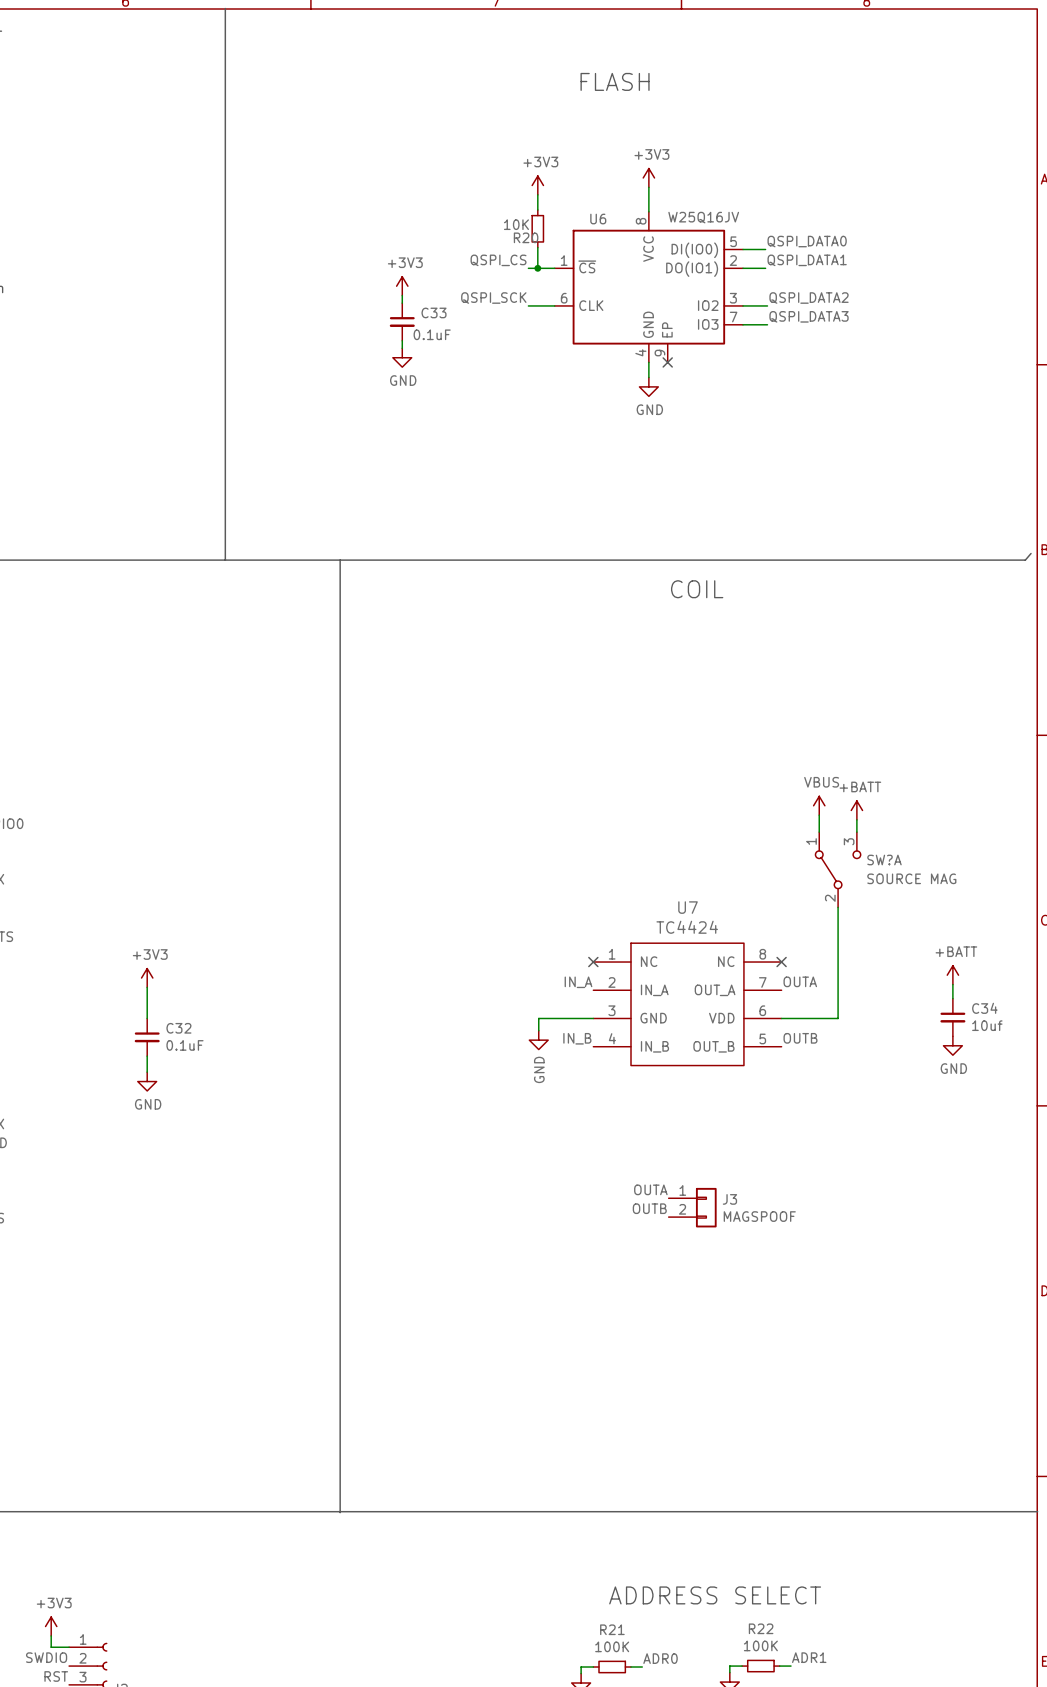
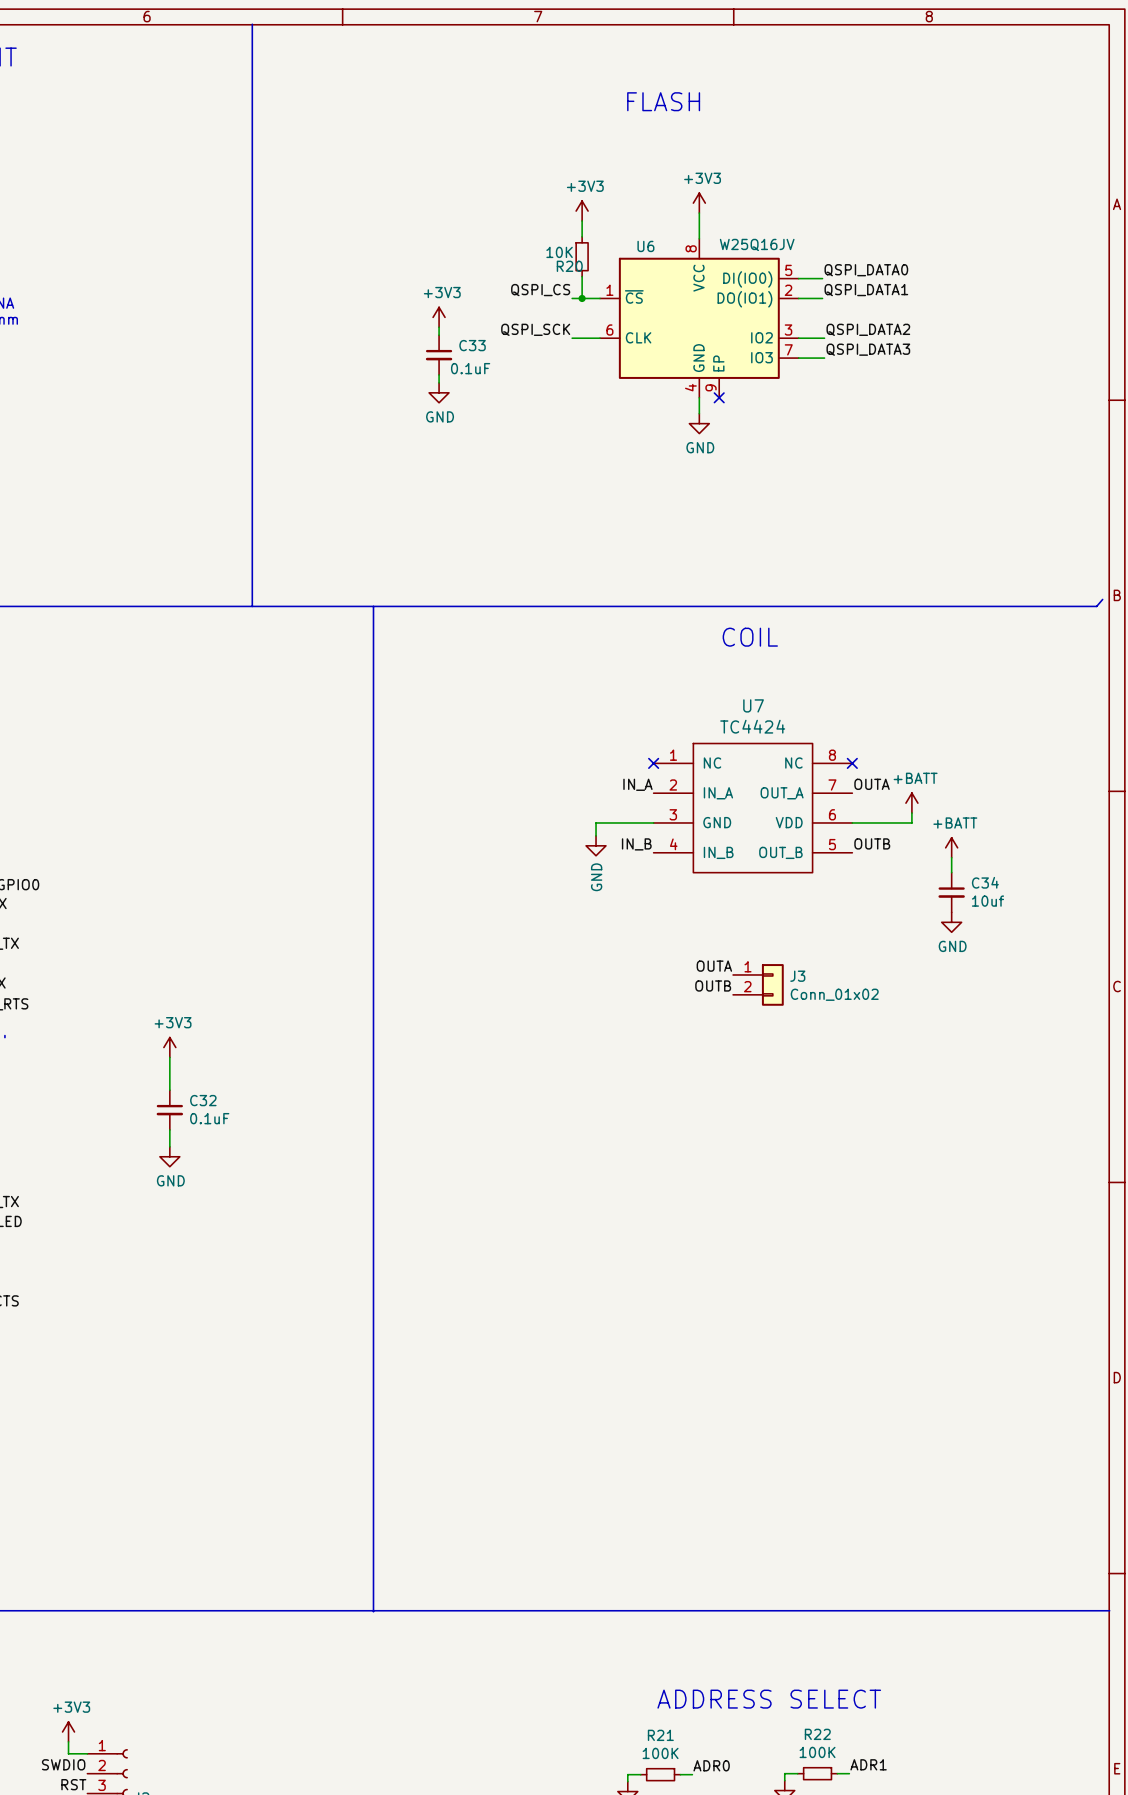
no-connect mark: none -> (653, 763)
no-connect mark: none -> (852, 763)
label: none -> OUTA (872, 784)
label: none -> IN_A (637, 784)
power symbol: none -> +BATT (911, 803)
wire: none -> (911, 813) (911, 822) (852, 822)
wire: none -> (653, 822) (596, 822) (596, 835)
label: none -> IN_B (636, 844)
label: none -> OUTB (872, 843)
power symbol: none -> GND (596, 845)
power symbol: none -> +BATT (951, 847)
wire: none -> (951, 857) (951, 872)
power symbol: VBUS (819, 805) -> none
power symbol: +BATT (856, 810) -> none
wire: (819, 815) (819, 832) -> none
wire: (856, 819) (856, 832) -> none
power symbol: none -> GND (951, 922)
SW?A: SOURCE MAG (838, 869) -> none
label: none -> OUTA (714, 966)
wire: (838, 907) (838, 1018) (781, 1018) -> none
label: none -> OUTB (713, 985)
no-connect mark: (593, 962) -> none
no-connect mark: (781, 962) -> none
power symbol: +BATT (952, 975) -> none
label: OUTA (800, 981) -> none
label: IN_A (578, 982) -> none
wire: (952, 984) (952, 998) -> none
U7 position: (687, 1004) -> (752, 808)
C34 position: (952, 1017) -> (951, 892)
wire: (593, 1018) (538, 1018) (538, 1030) -> none
label: IN_B (577, 1038) -> none
label: OUTB (800, 1038) -> none
power symbol: GND (538, 1040) -> none
power symbol: GND (952, 1045) -> none
label: OUTA (650, 1189) -> none
J3 position: (692, 1207) -> (758, 984)
label: OUTB (649, 1208) -> none
J3 value: MAGSPOOF (759, 1216) -> Conn_01x02 (834, 994)

